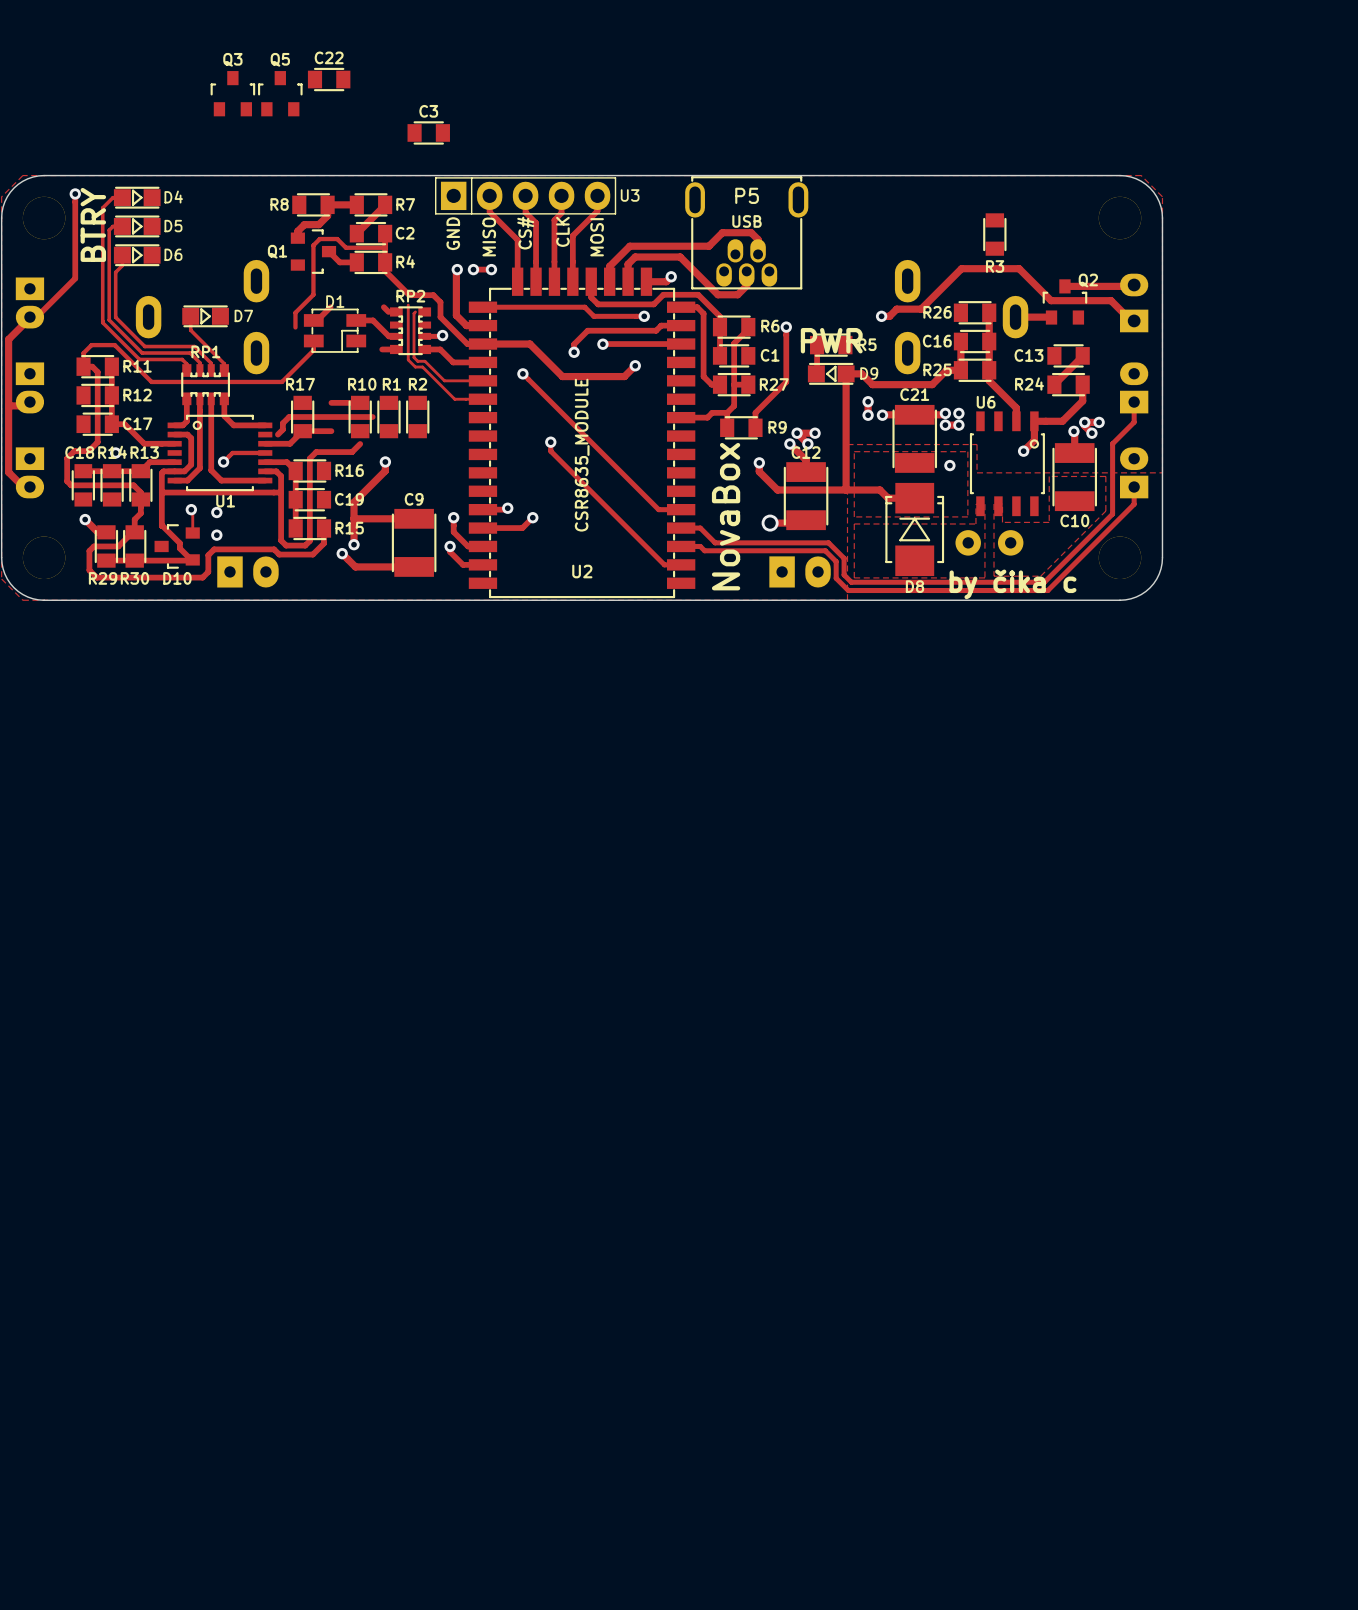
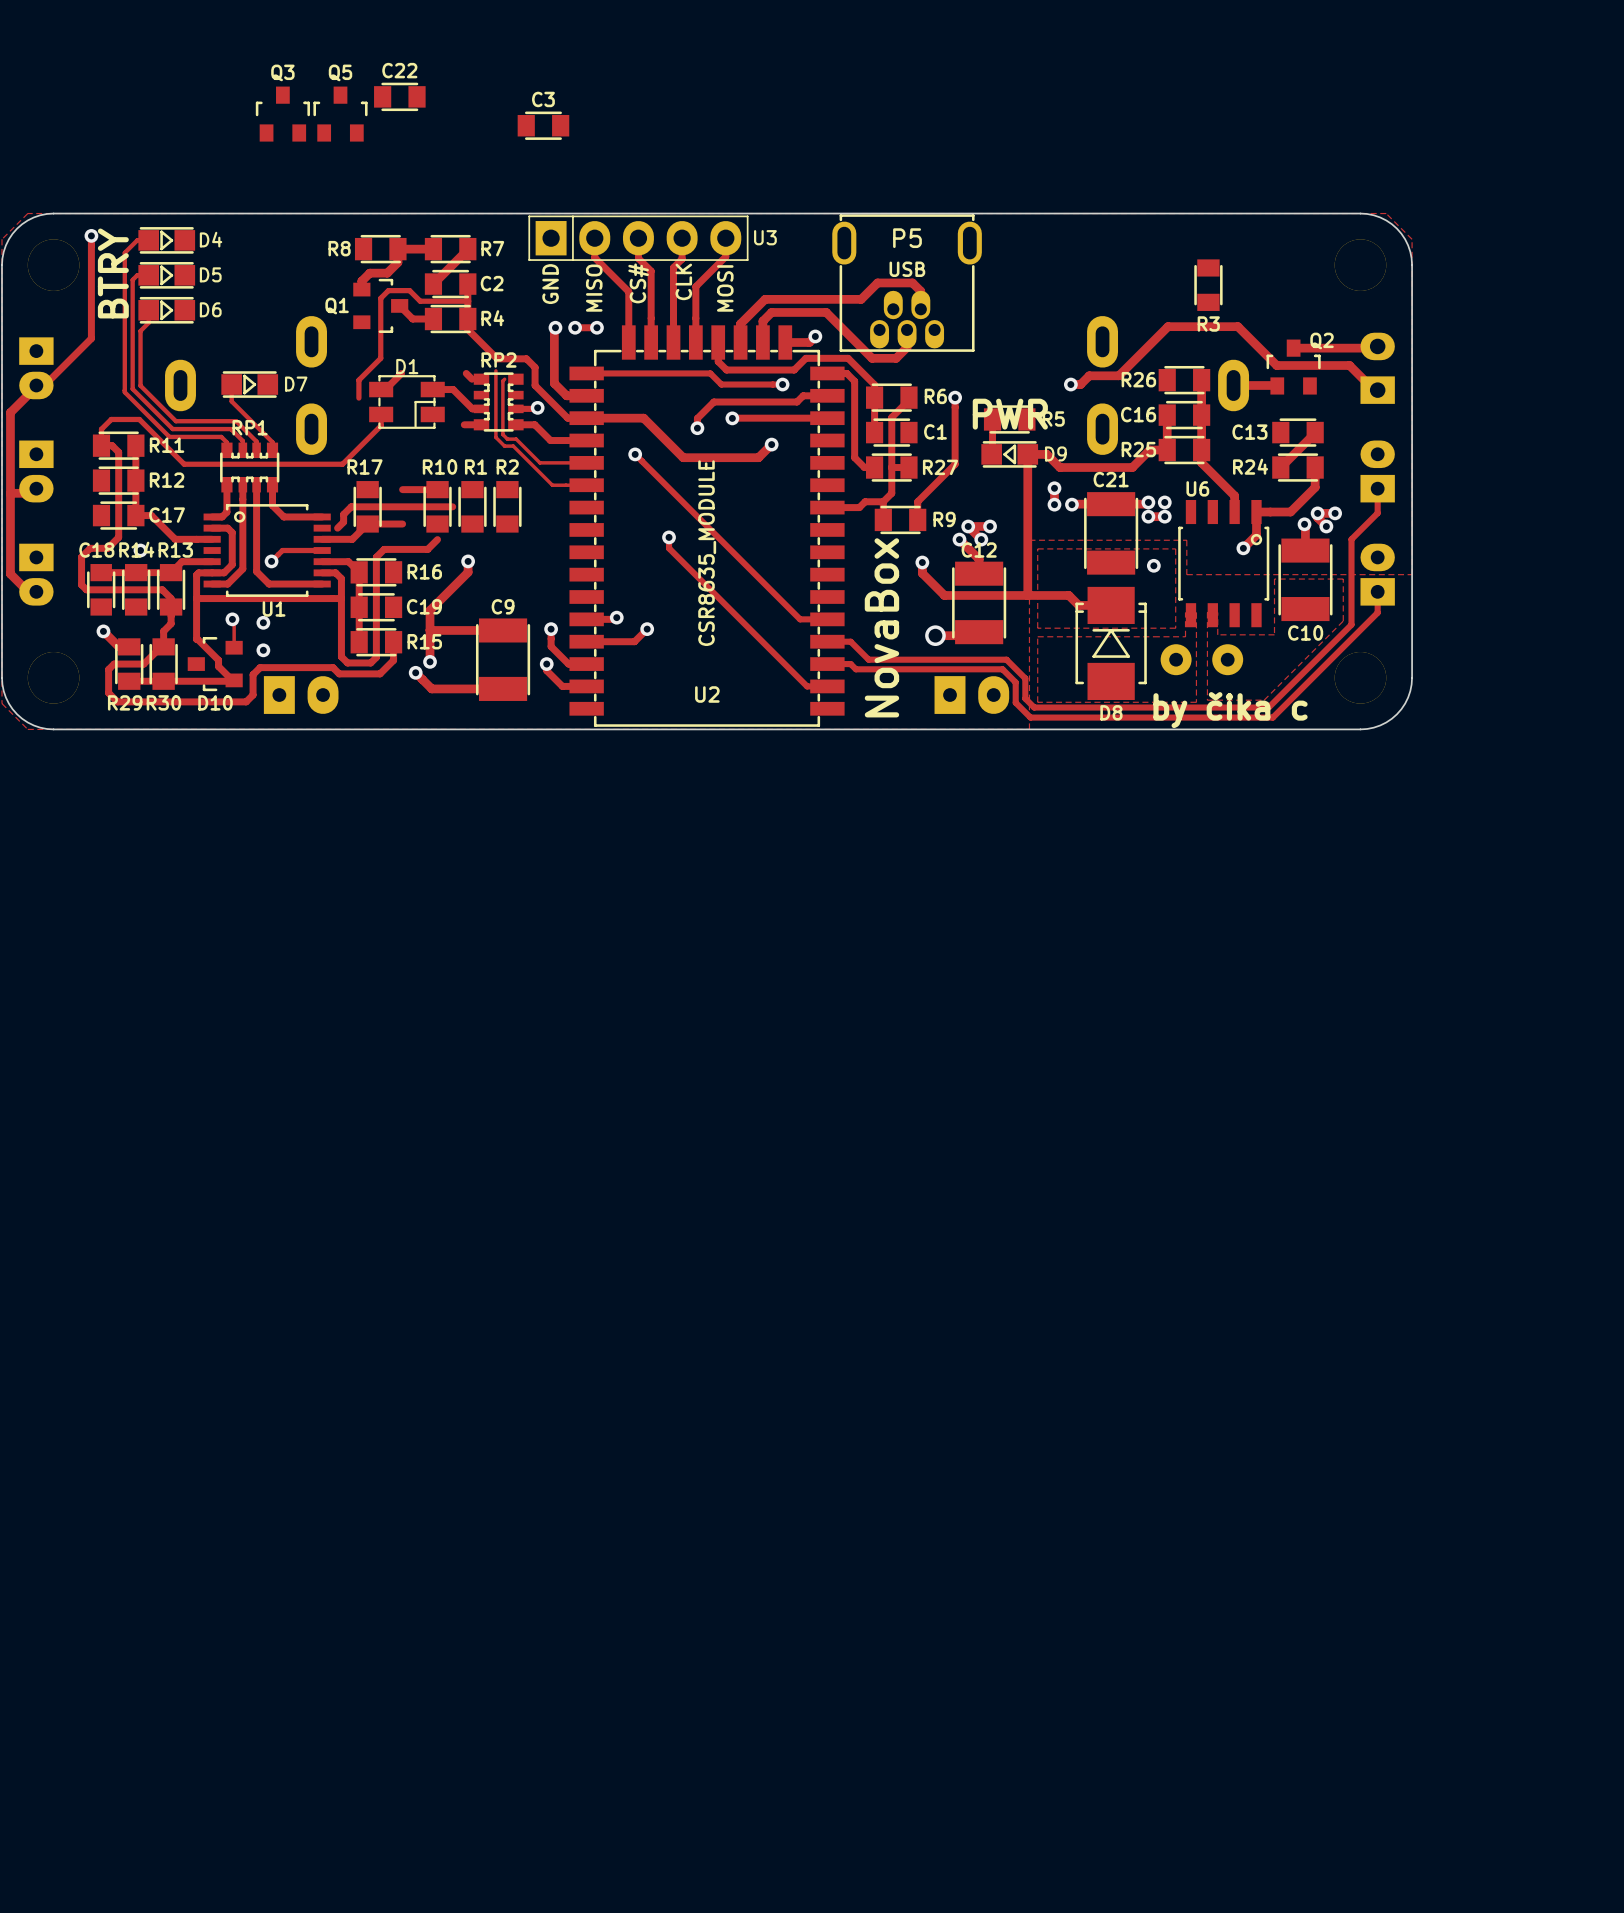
C3 position: (428, 132) -> (543, 125)

